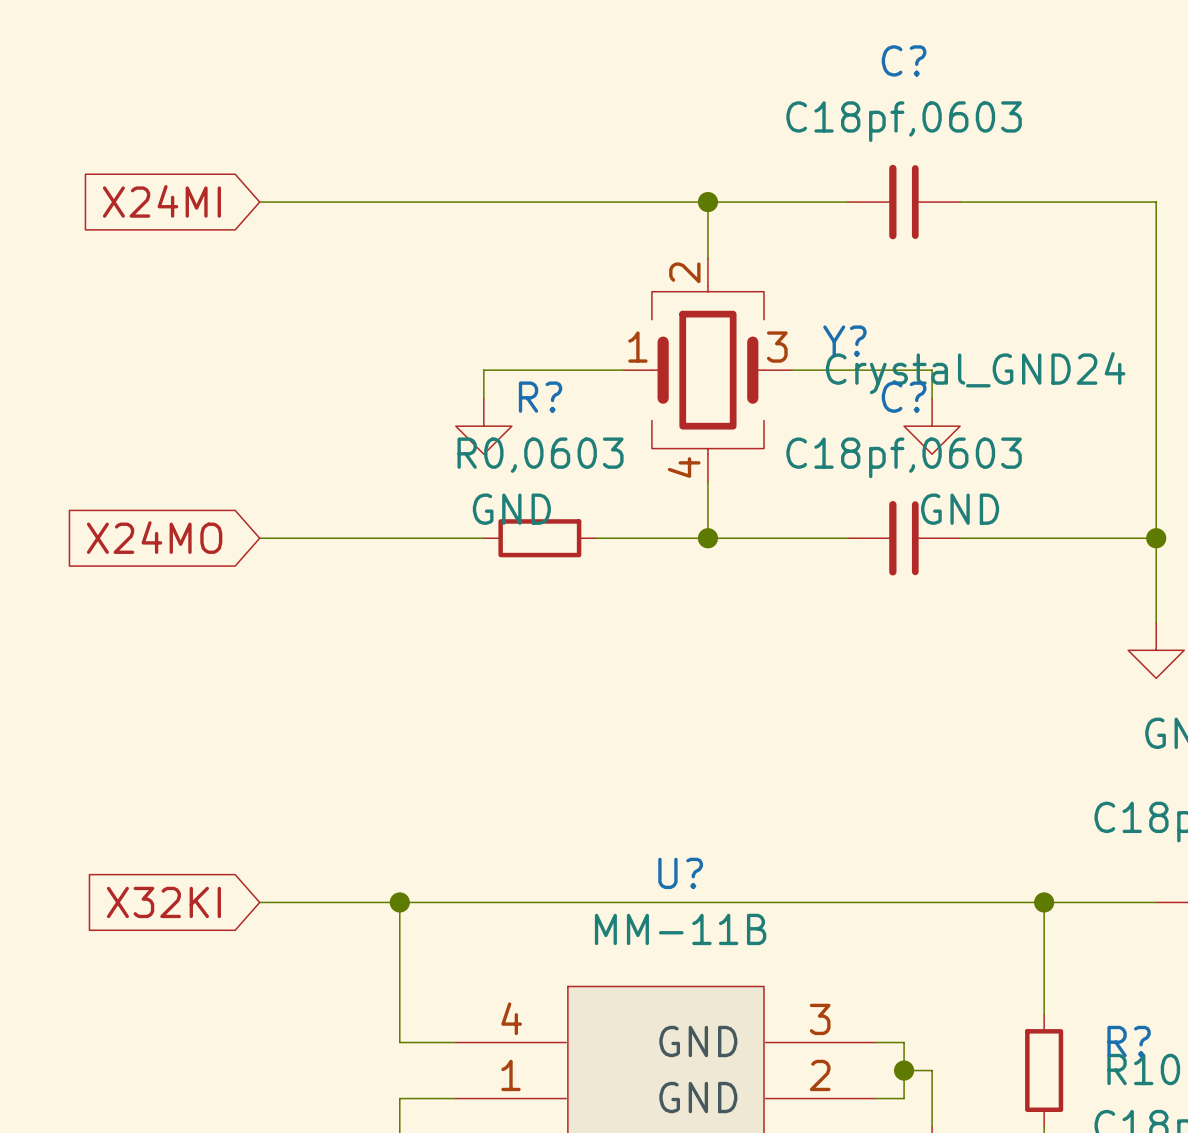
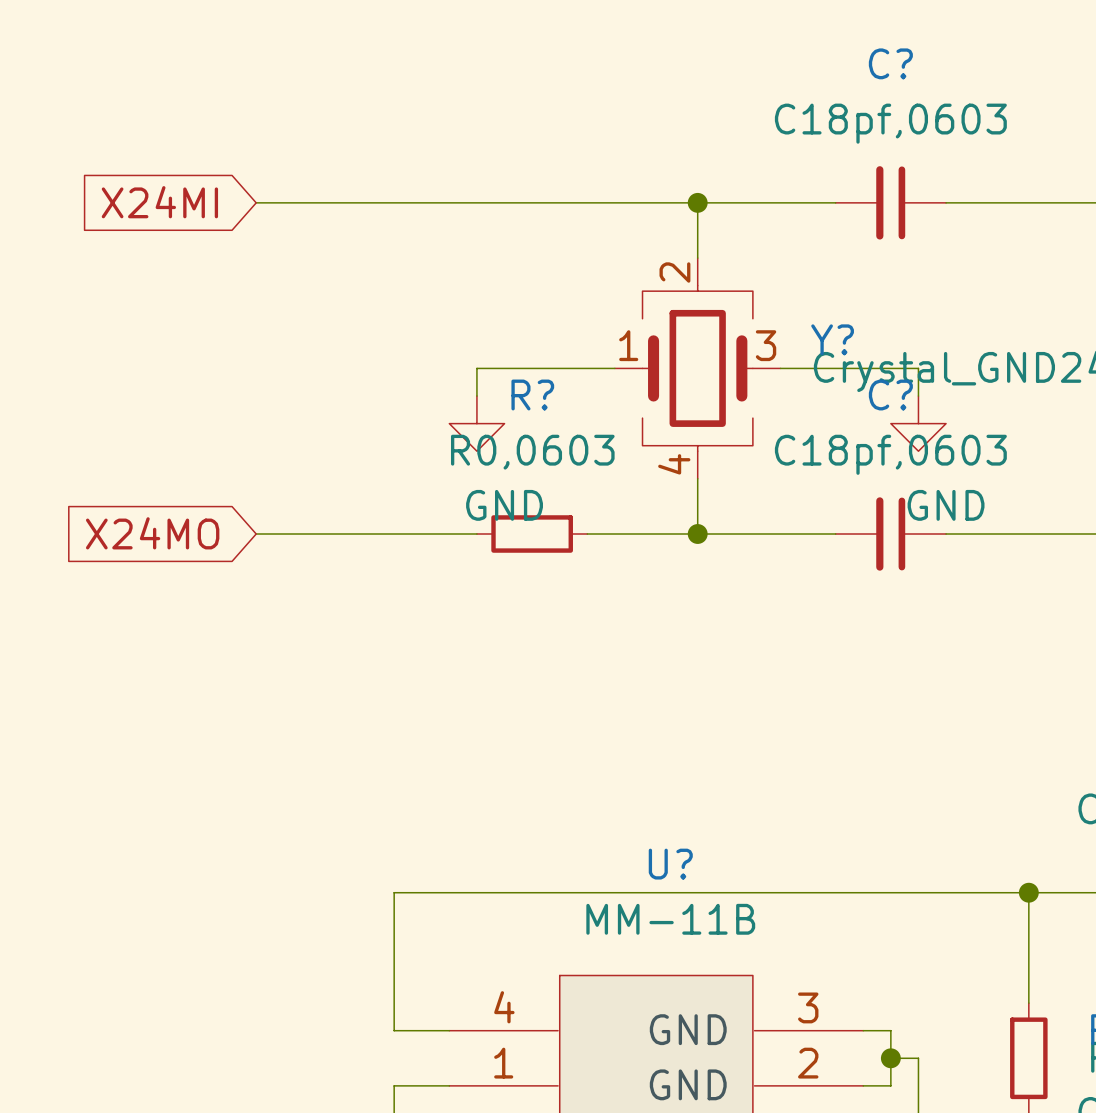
global label: X32KI (163, 902) -> none
wire: (259, 902) (399, 902) -> none
junction: (399, 902) -> none

